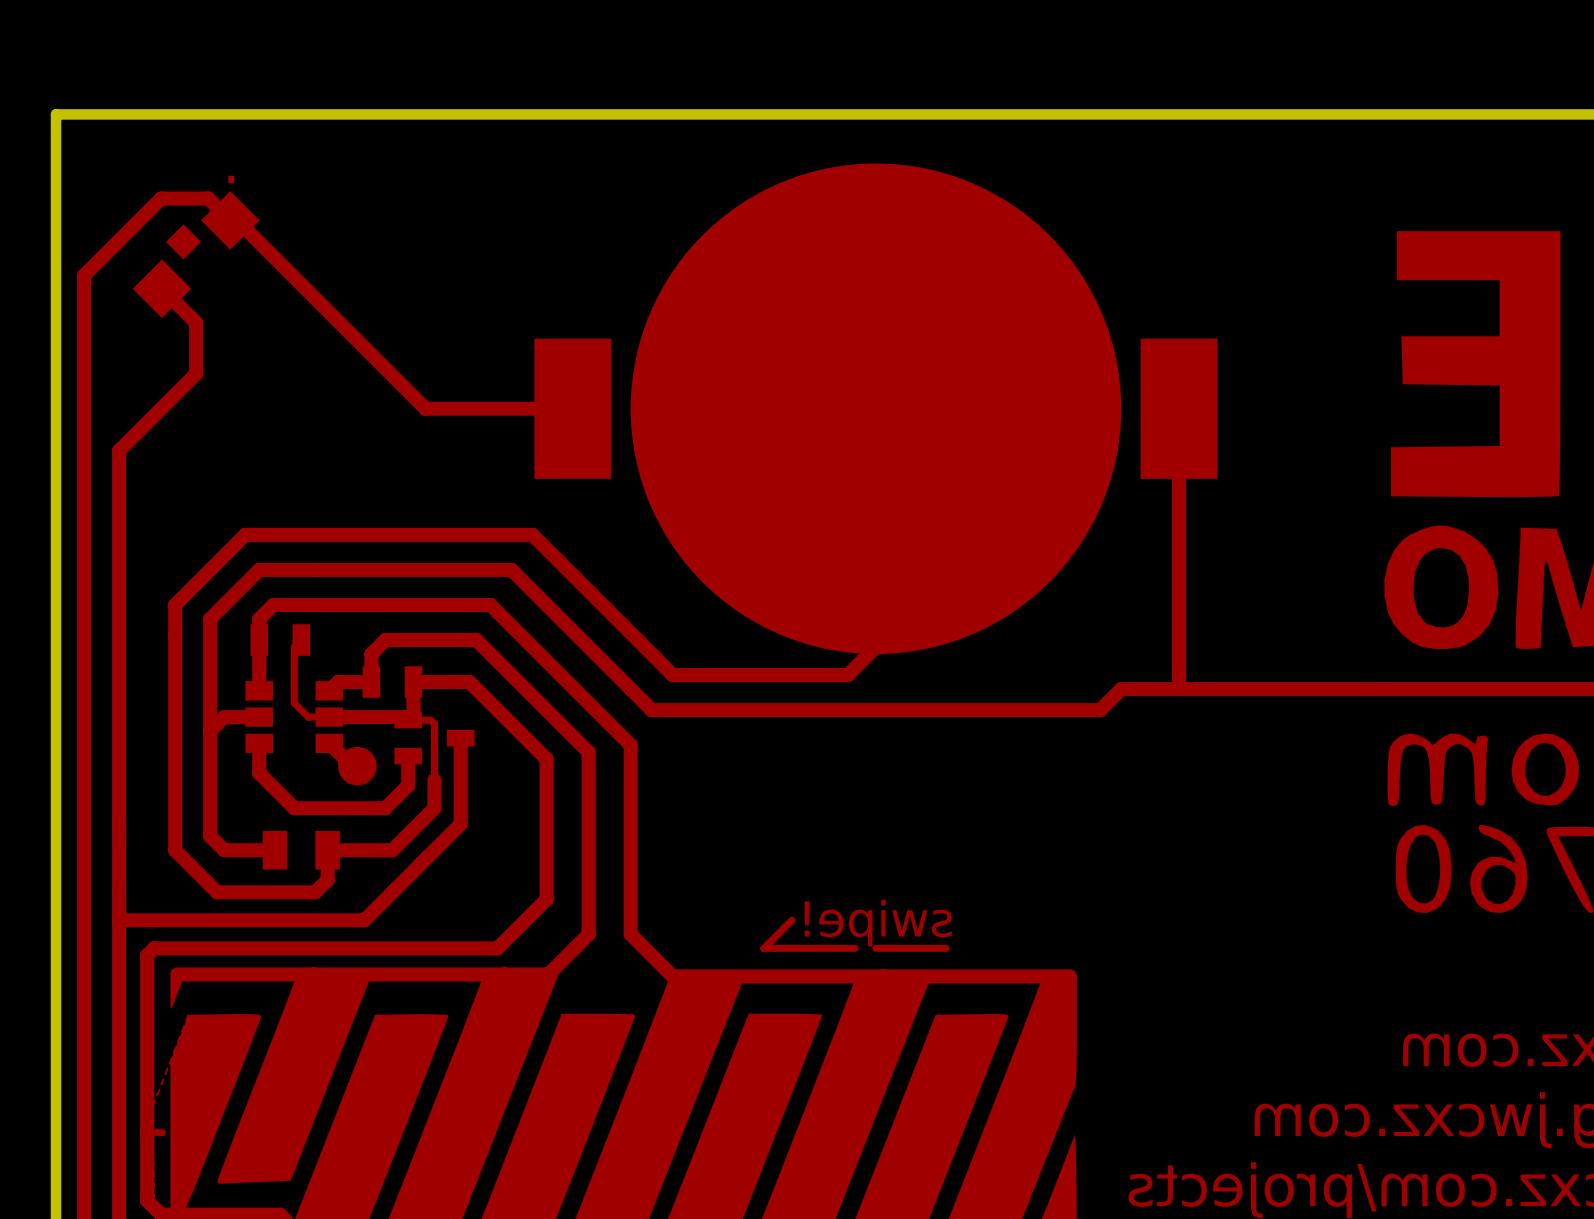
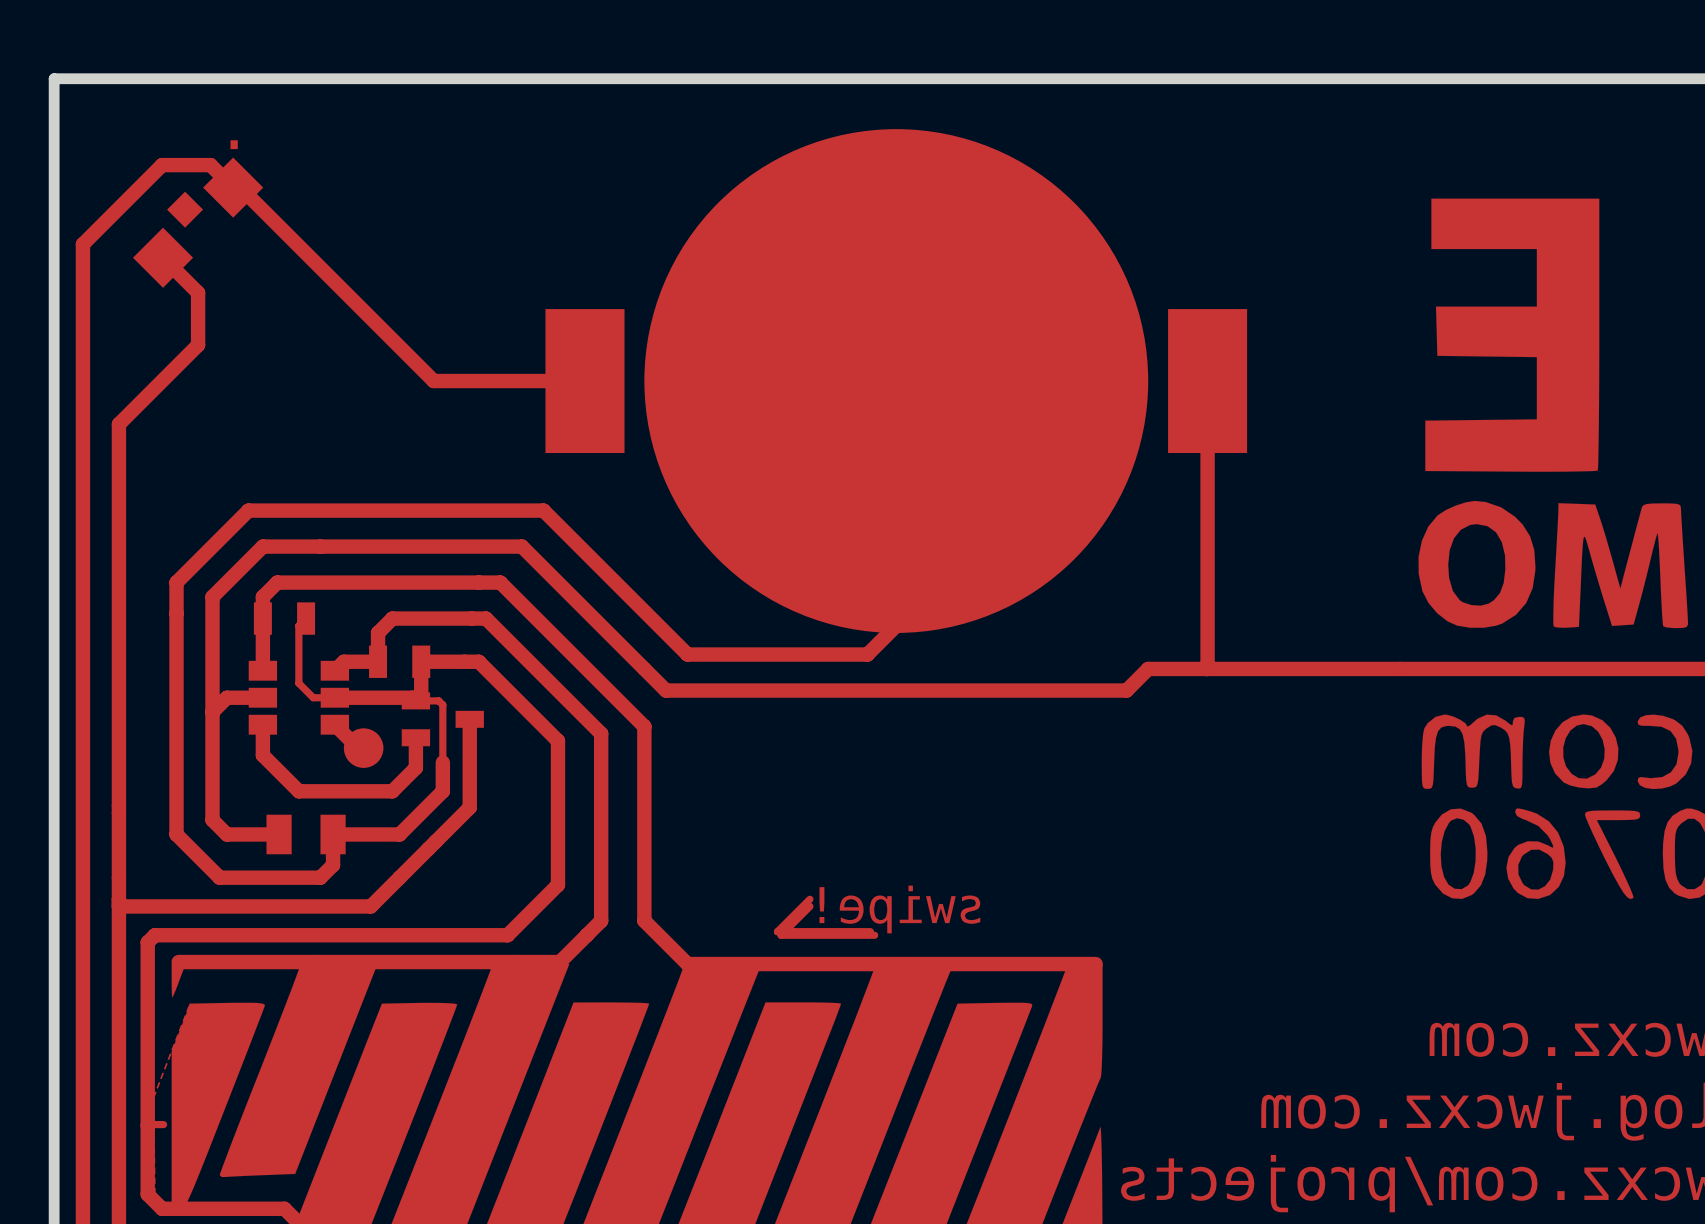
top track: none -> (809, 899) (777, 931) (870, 931)
top track: (946, 948) (875, 948) -> none

